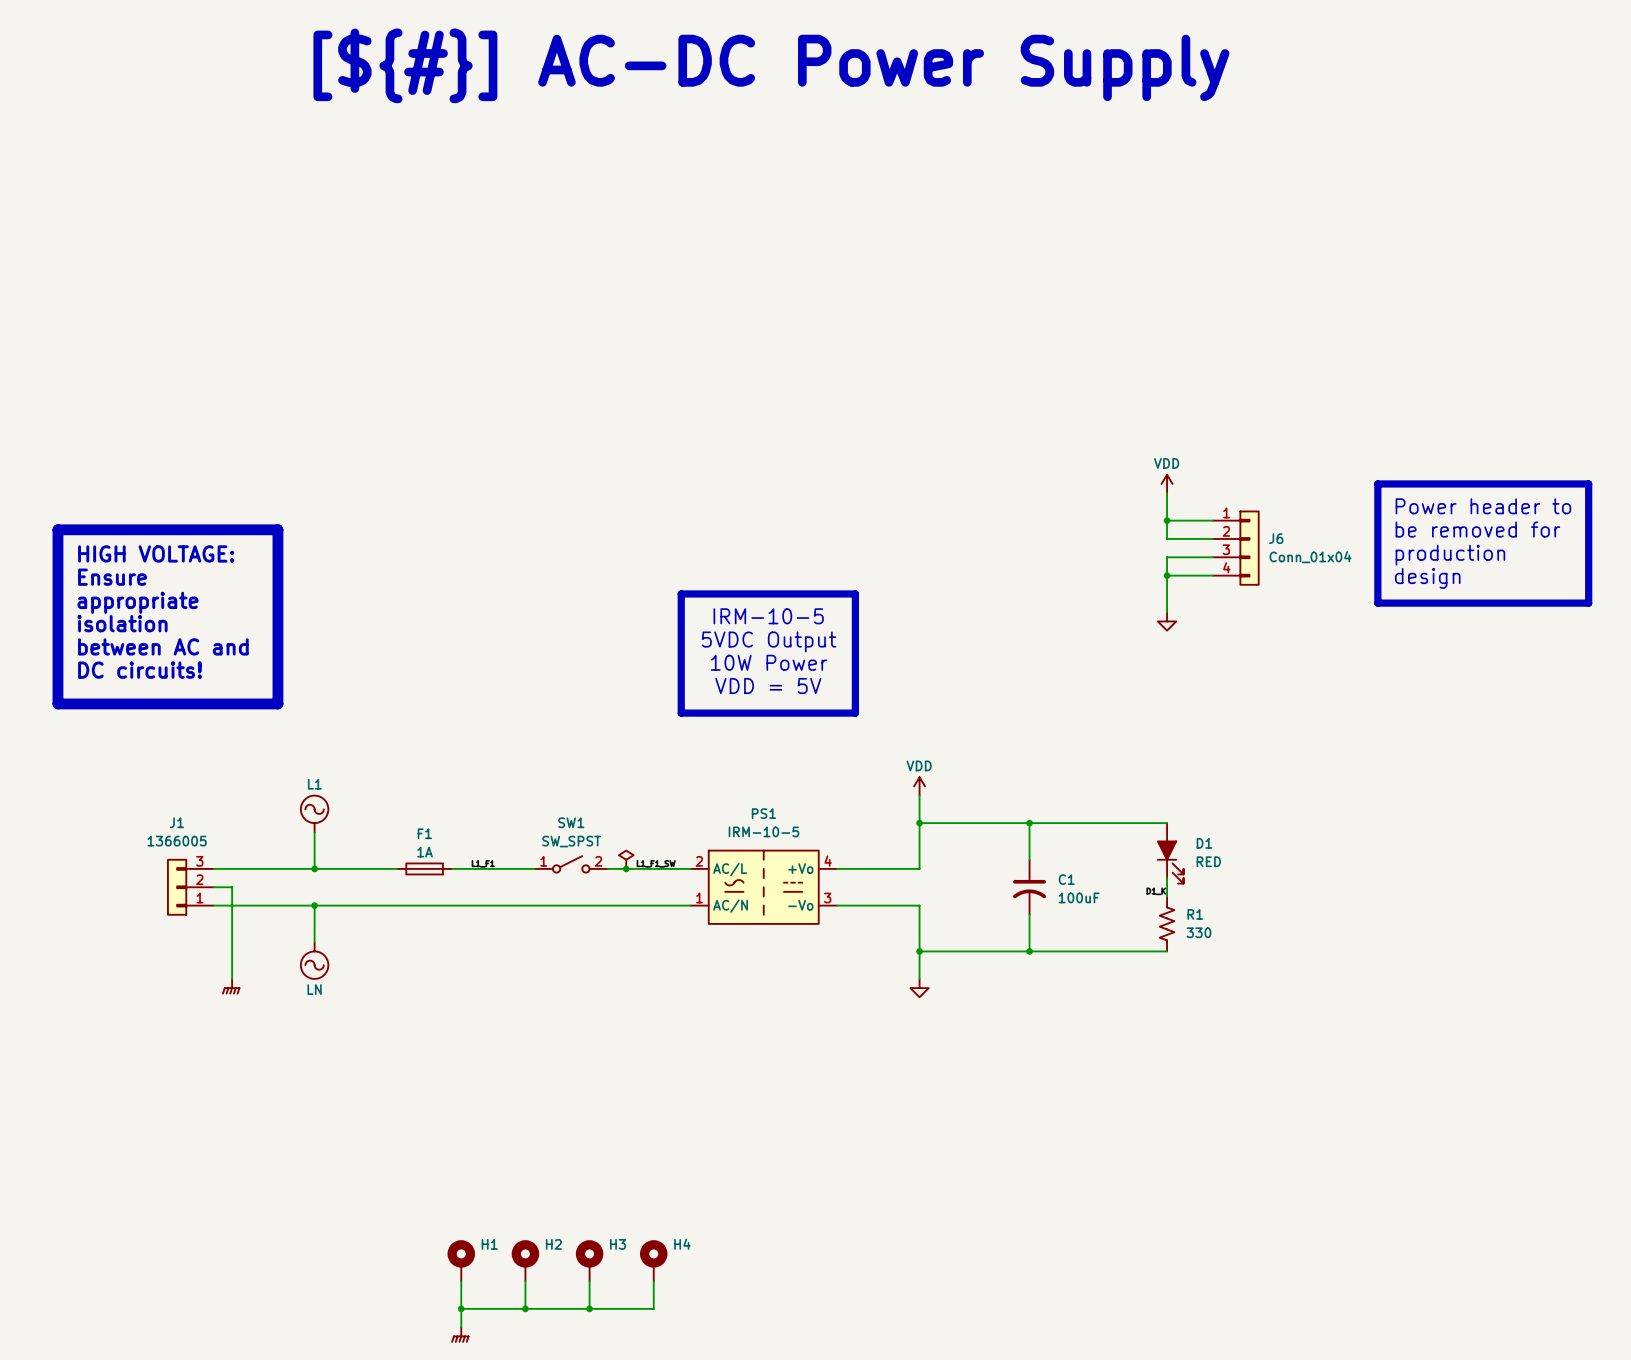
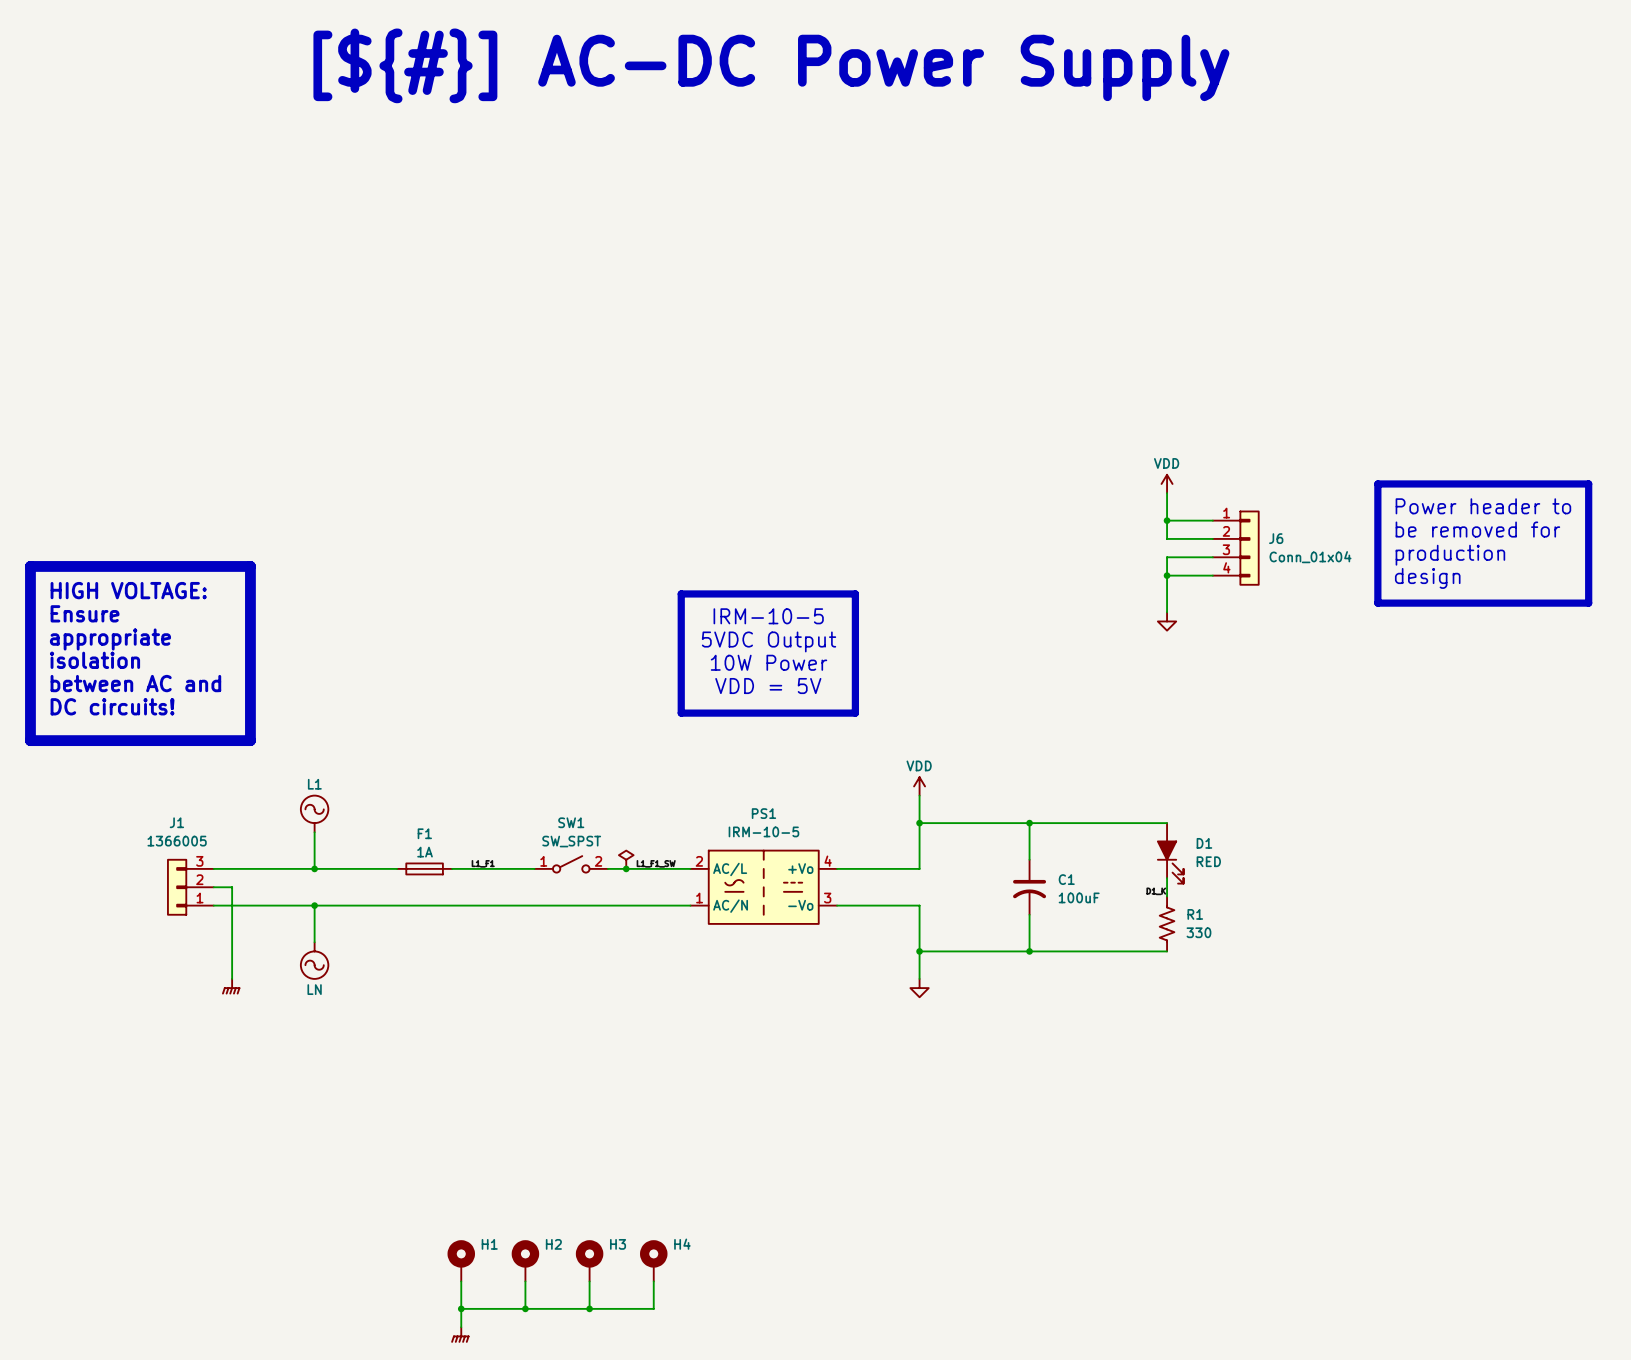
line: (57, 529) (277, 529) (277, 703) (57, 703) (57, 529) -> (30, 566) (250, 566) (250, 740) (30, 740) (30, 566)
text position: HIGH VOLTAGE: (156, 553) -> HIGH VOLTAGE: (128, 590)
text position: Ensure (112, 577) -> Ensure (85, 613)
text position: appropriate (137, 602) -> appropriate (110, 639)
text position: isolation (122, 623) -> isolation (95, 660)
text position: between AC and (163, 646) -> between AC and (135, 683)
text position: DC circuits! (140, 670) -> DC circuits! (112, 706)

